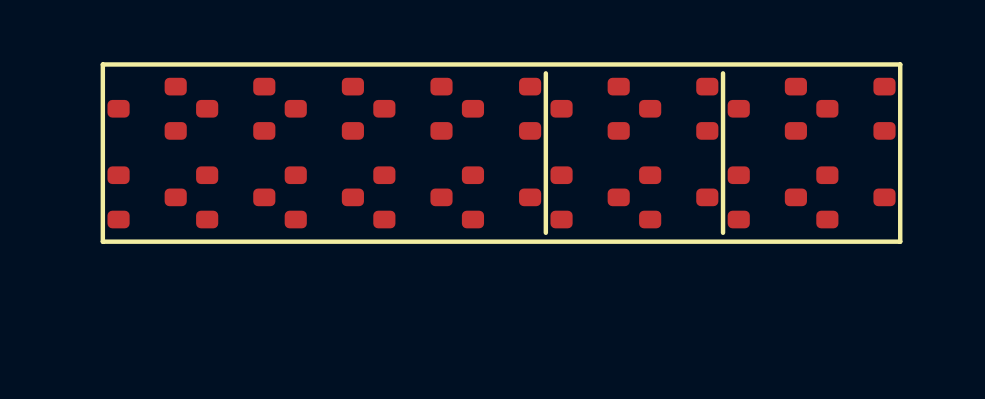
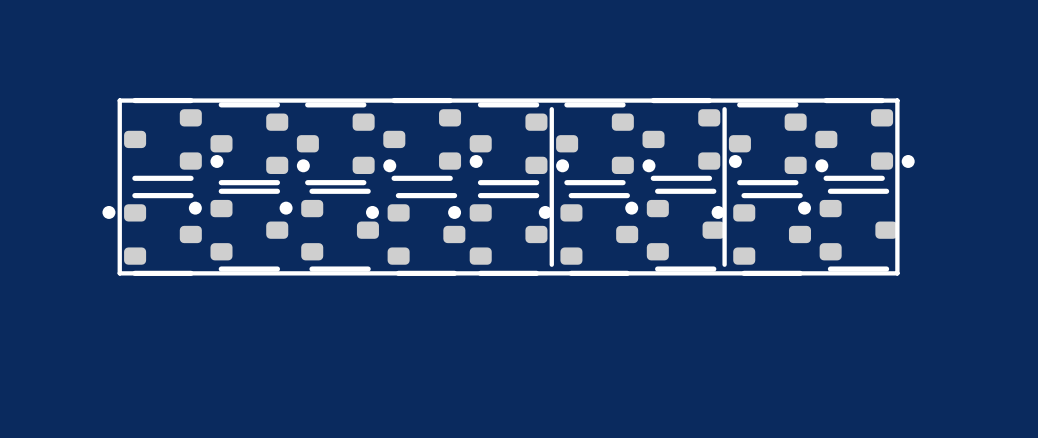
part footprint: [107, 77, 187, 140] -> [124, 97, 224, 181]
part footprint: [196, 77, 276, 140] -> [210, 102, 310, 186]
part footprint: [284, 77, 364, 140] -> [296, 102, 397, 186]
part footprint: [373, 77, 453, 140] -> [383, 97, 483, 181]
part footprint: [461, 77, 542, 140] -> [469, 102, 570, 186]
part footprint: [550, 77, 630, 140] -> [556, 102, 656, 186]
part footprint: [639, 77, 719, 140] -> [642, 97, 742, 181]
part footprint: [727, 77, 807, 140] -> [728, 102, 829, 186]
part footprint: [816, 77, 896, 140] -> [815, 97, 915, 181]
part footprint: [107, 166, 187, 229] -> [102, 193, 202, 276]
part footprint: [196, 166, 276, 229] -> [188, 188, 289, 272]
part footprint: [284, 166, 364, 229] -> [279, 188, 379, 272]
part footprint: [373, 166, 453, 229] -> [366, 193, 466, 276]
part footprint: [461, 166, 542, 229] -> [448, 193, 548, 276]
part footprint: [550, 166, 630, 229] -> [538, 193, 639, 276]
part footprint: [639, 166, 719, 229] -> [625, 188, 725, 272]
part footprint: [727, 166, 807, 229] -> [711, 193, 811, 276]
part footprint: [816, 166, 896, 229] -> [798, 188, 898, 272]

